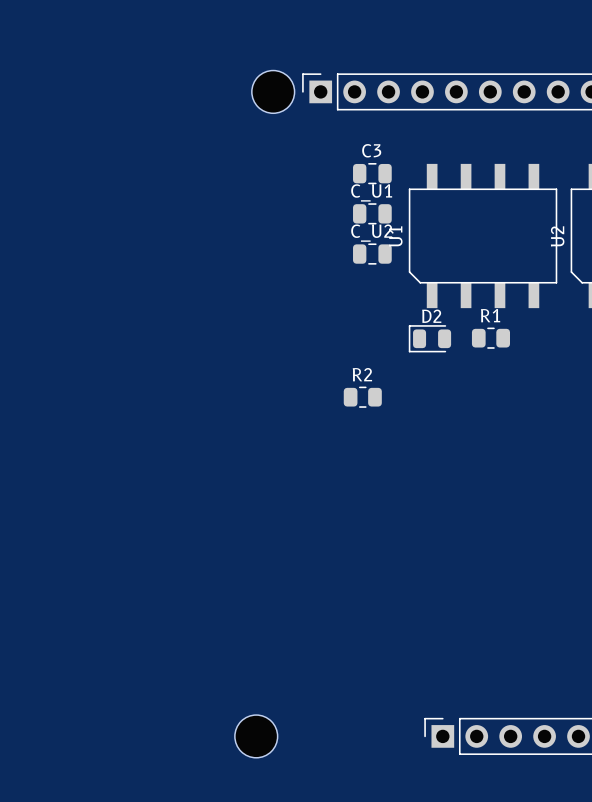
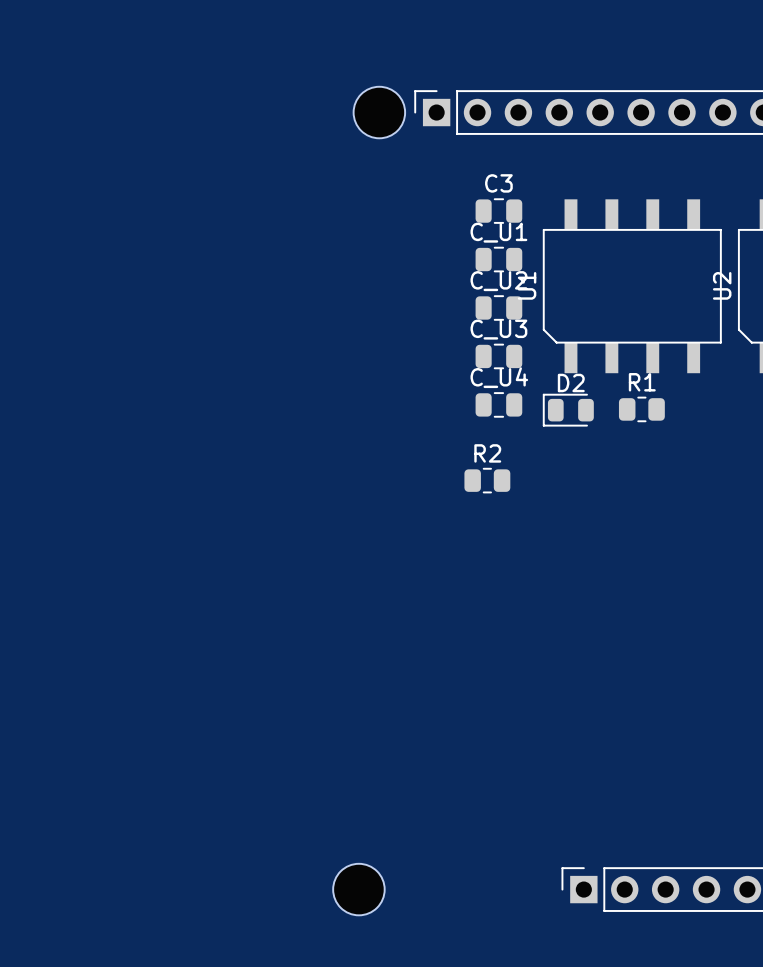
C_U3: none -> (498, 356)
C_U4: none -> (498, 404)

